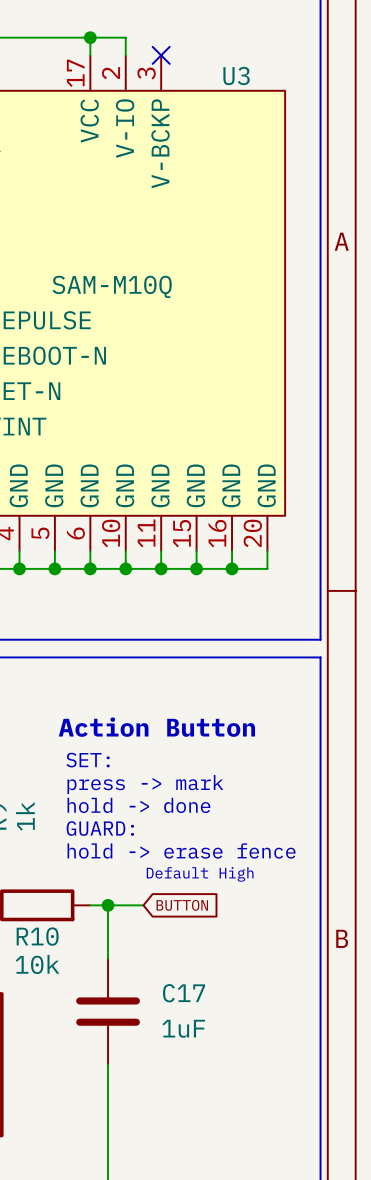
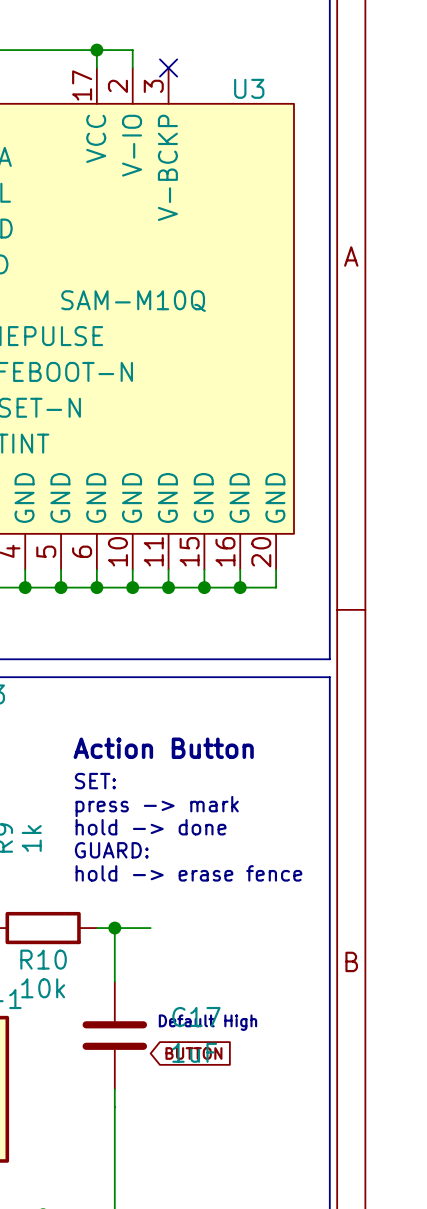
text position: Default High (200, 874) -> Default High (207, 1022)
global label position: BUTTON (182, 905) -> BUTTON (193, 1053)

